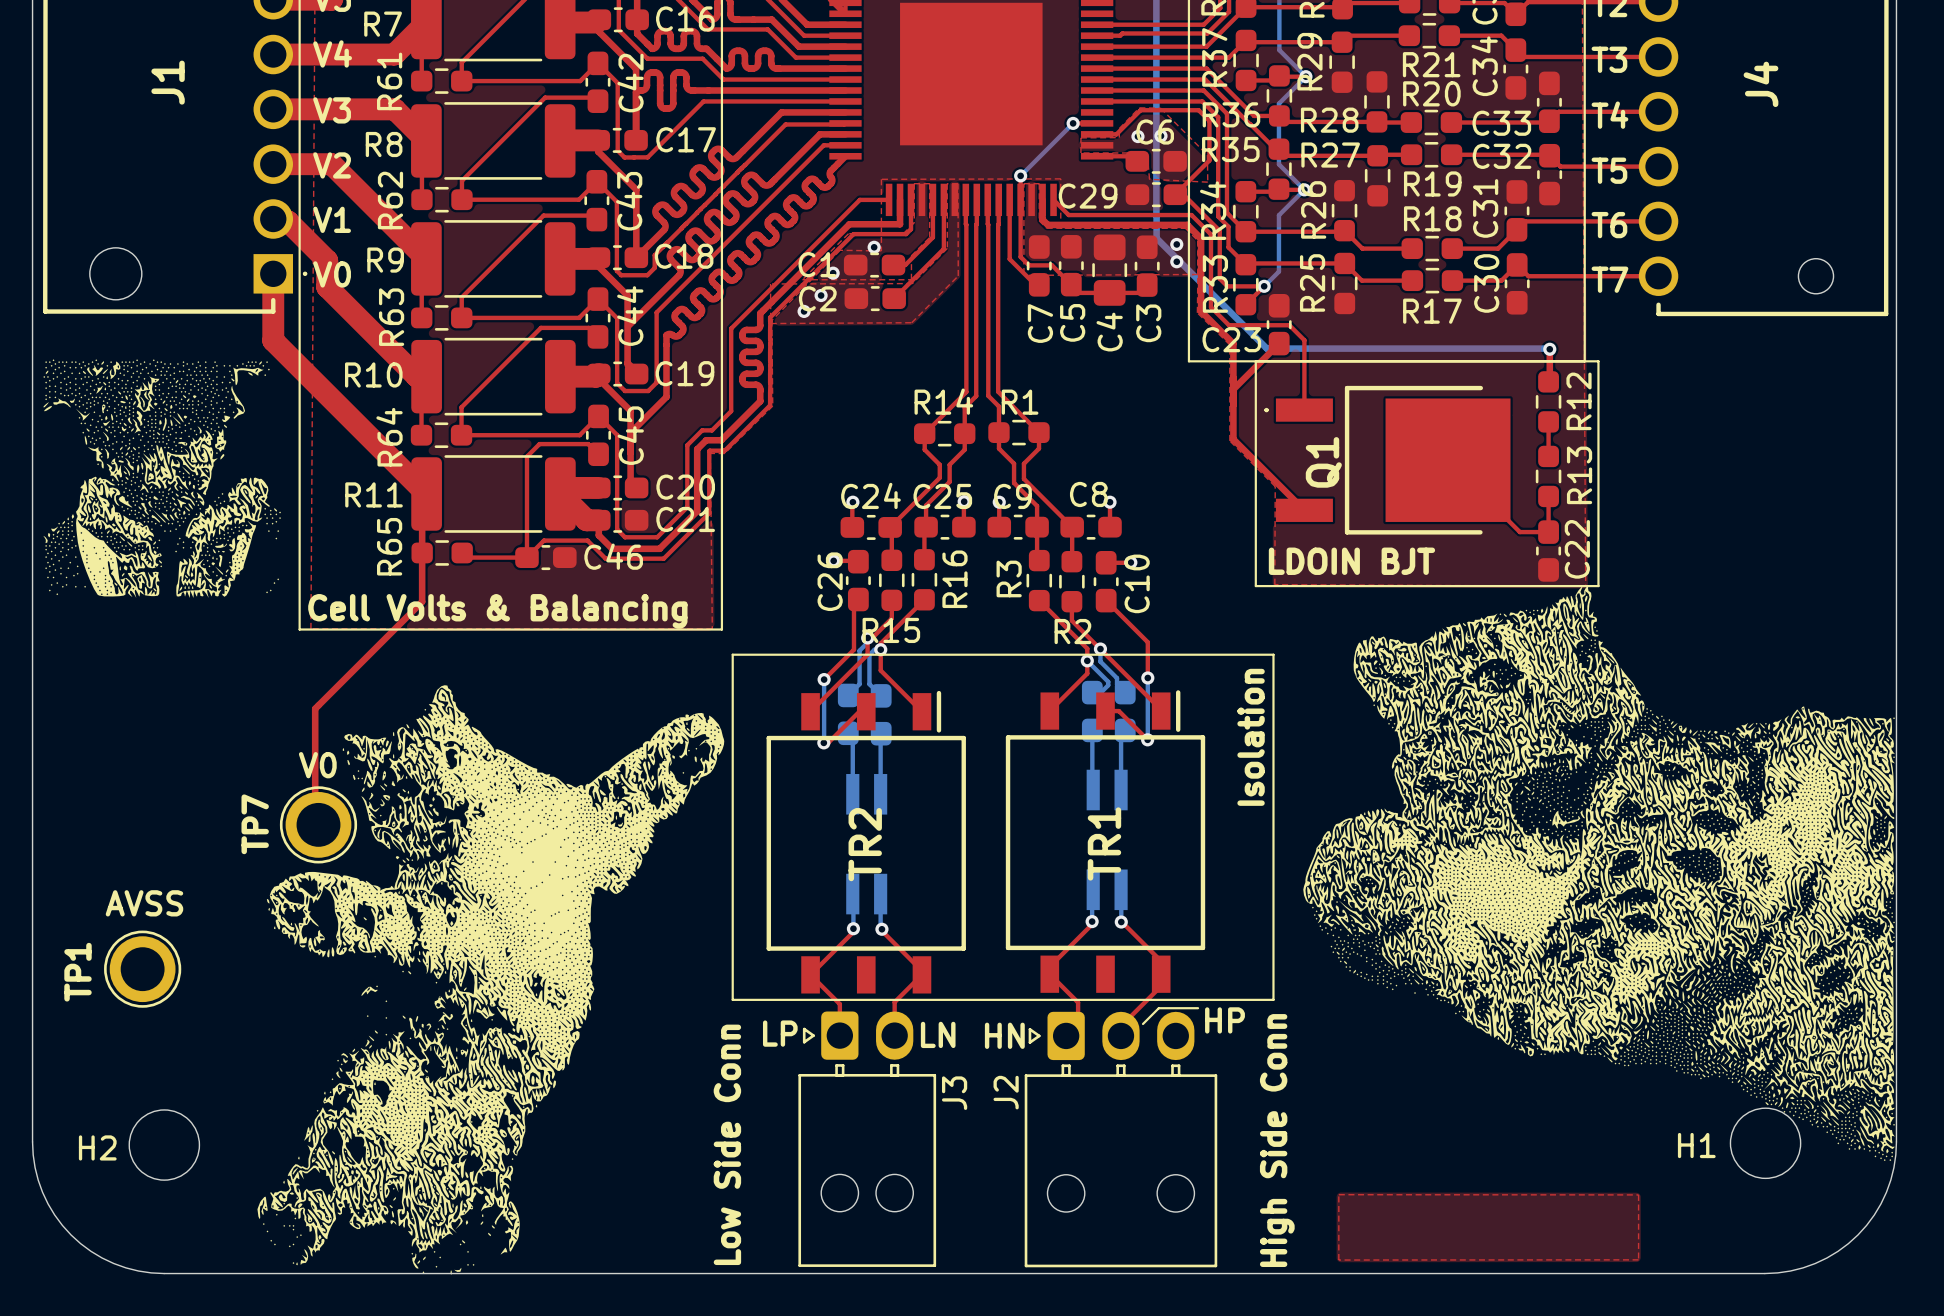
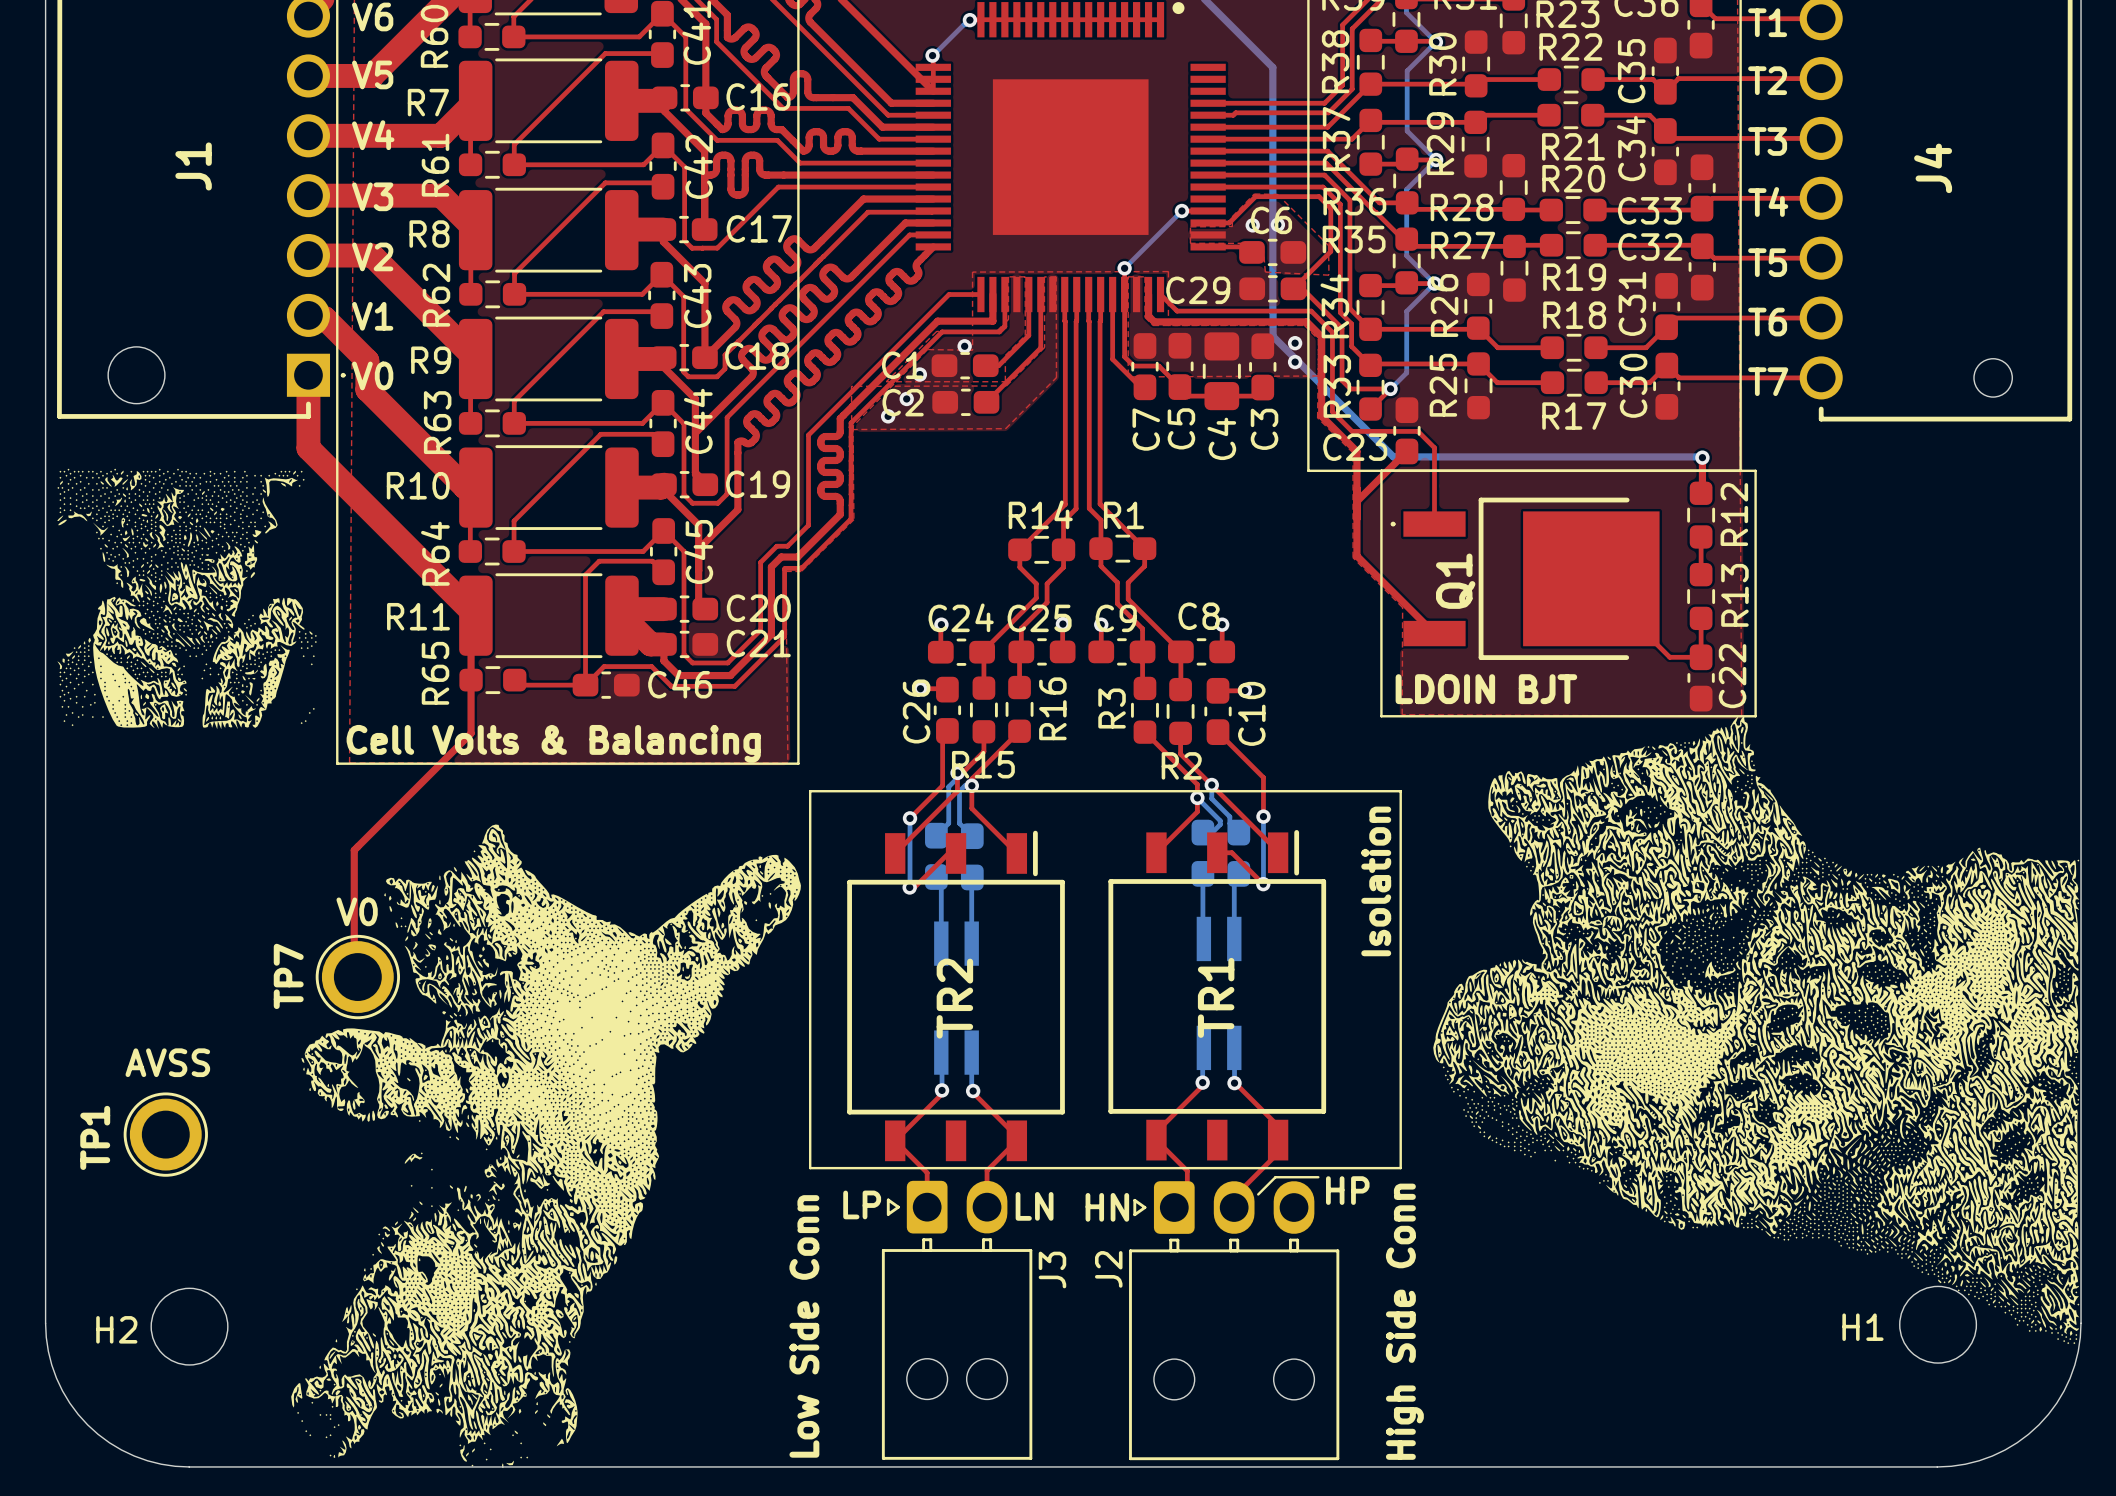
top zone outline: (1338, 1194) (1638, 1194) (1638, 1259) (1338, 1260) (1338, 1194) -> none

